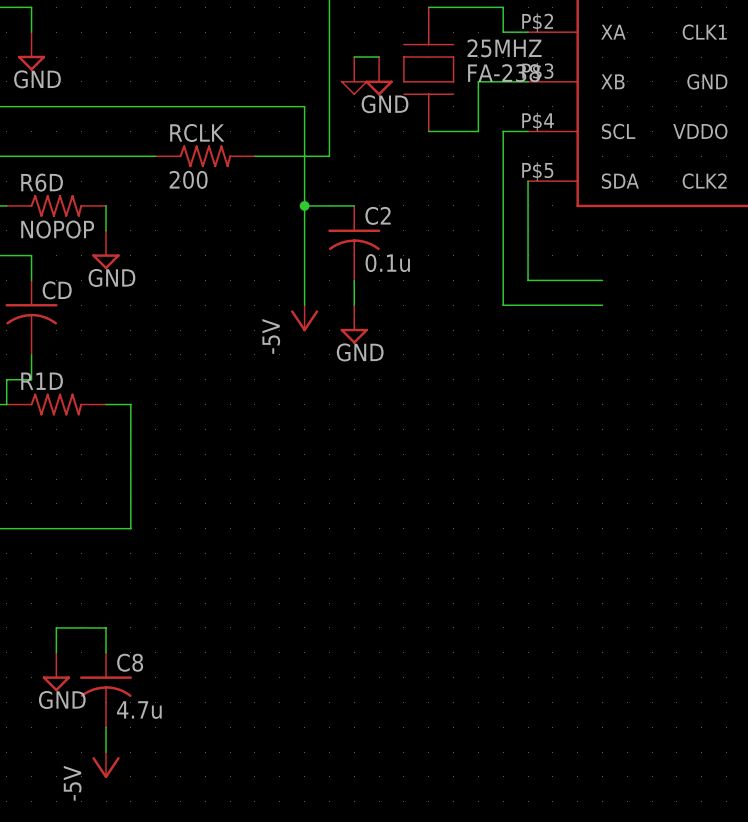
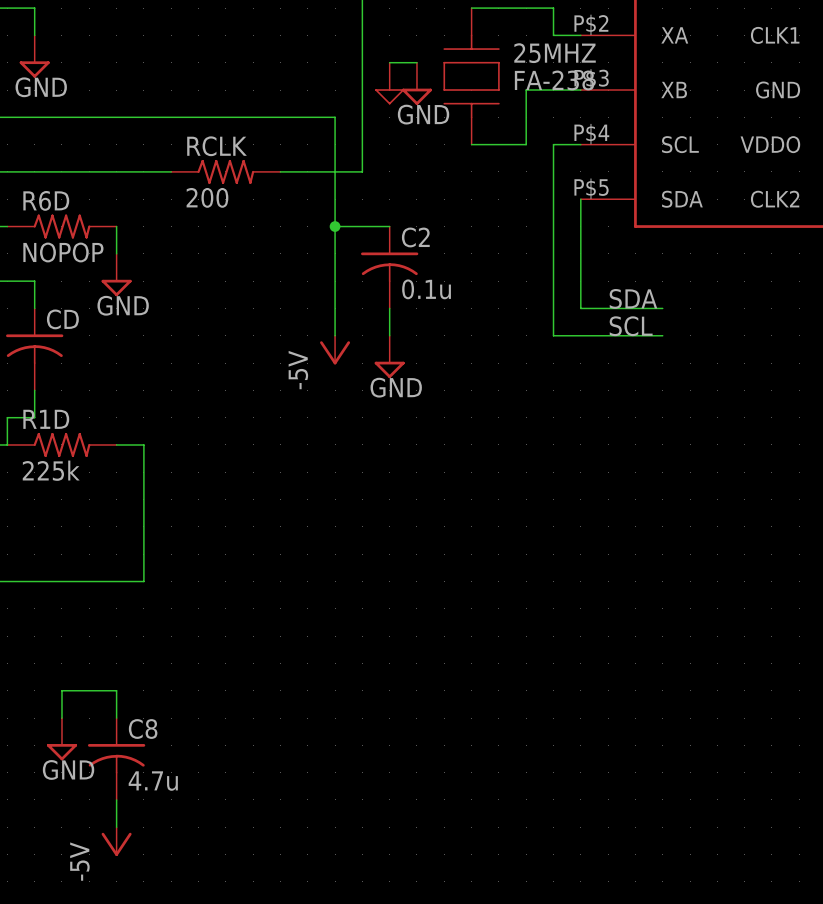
label: none -> SDA (633, 298)
label: none -> SCL (631, 326)
R1D value: none -> 225k (51, 470)

